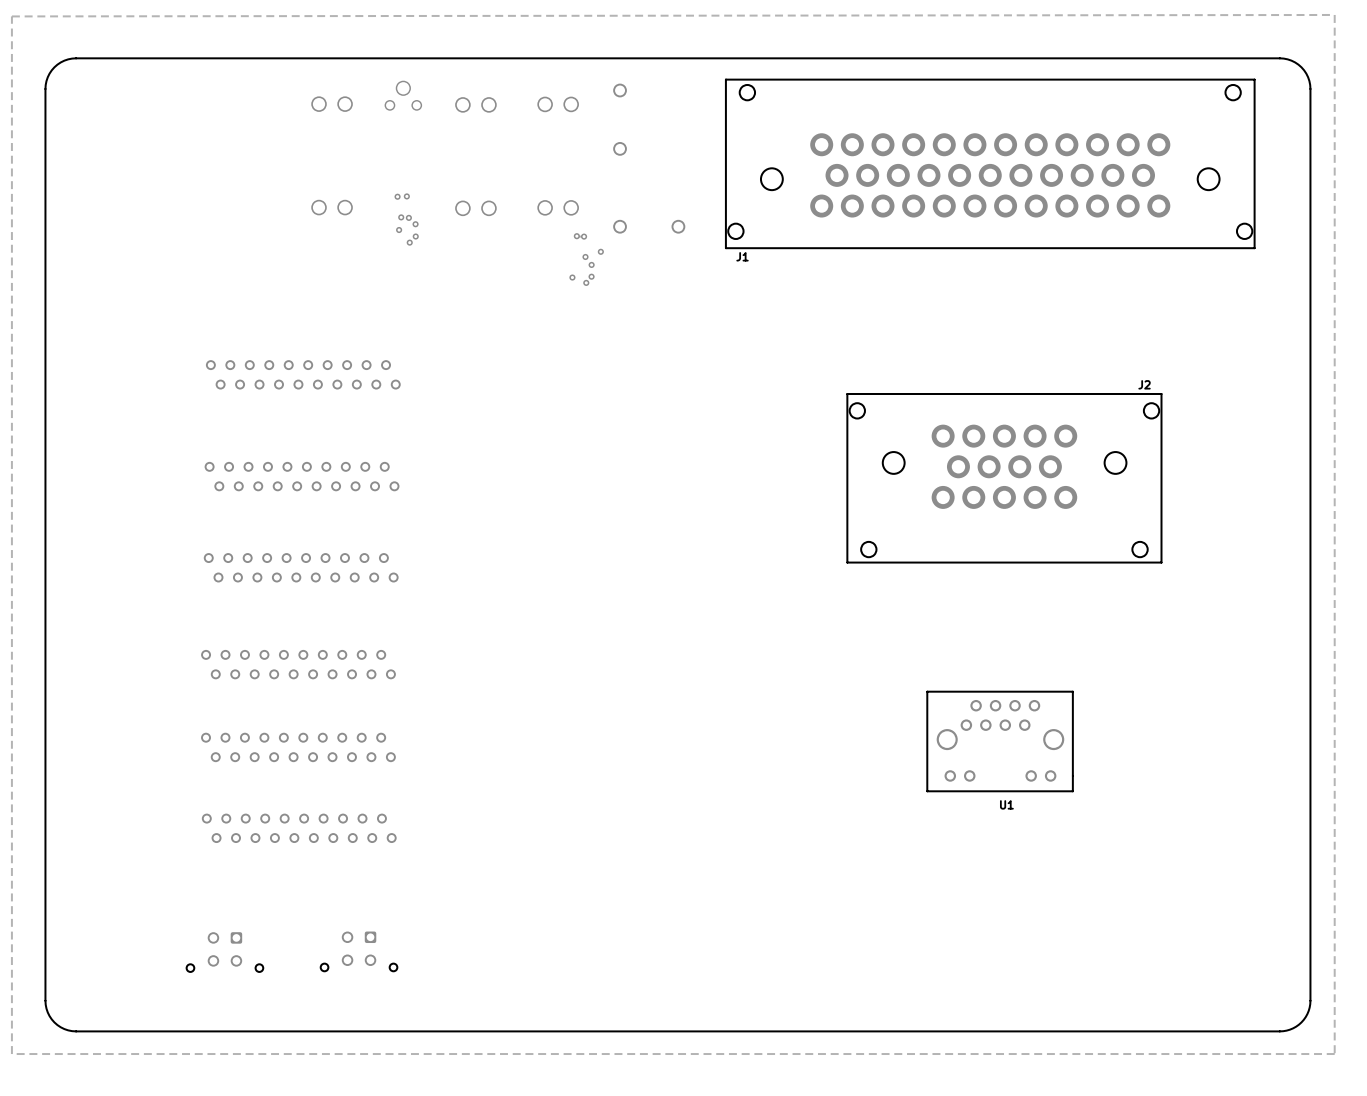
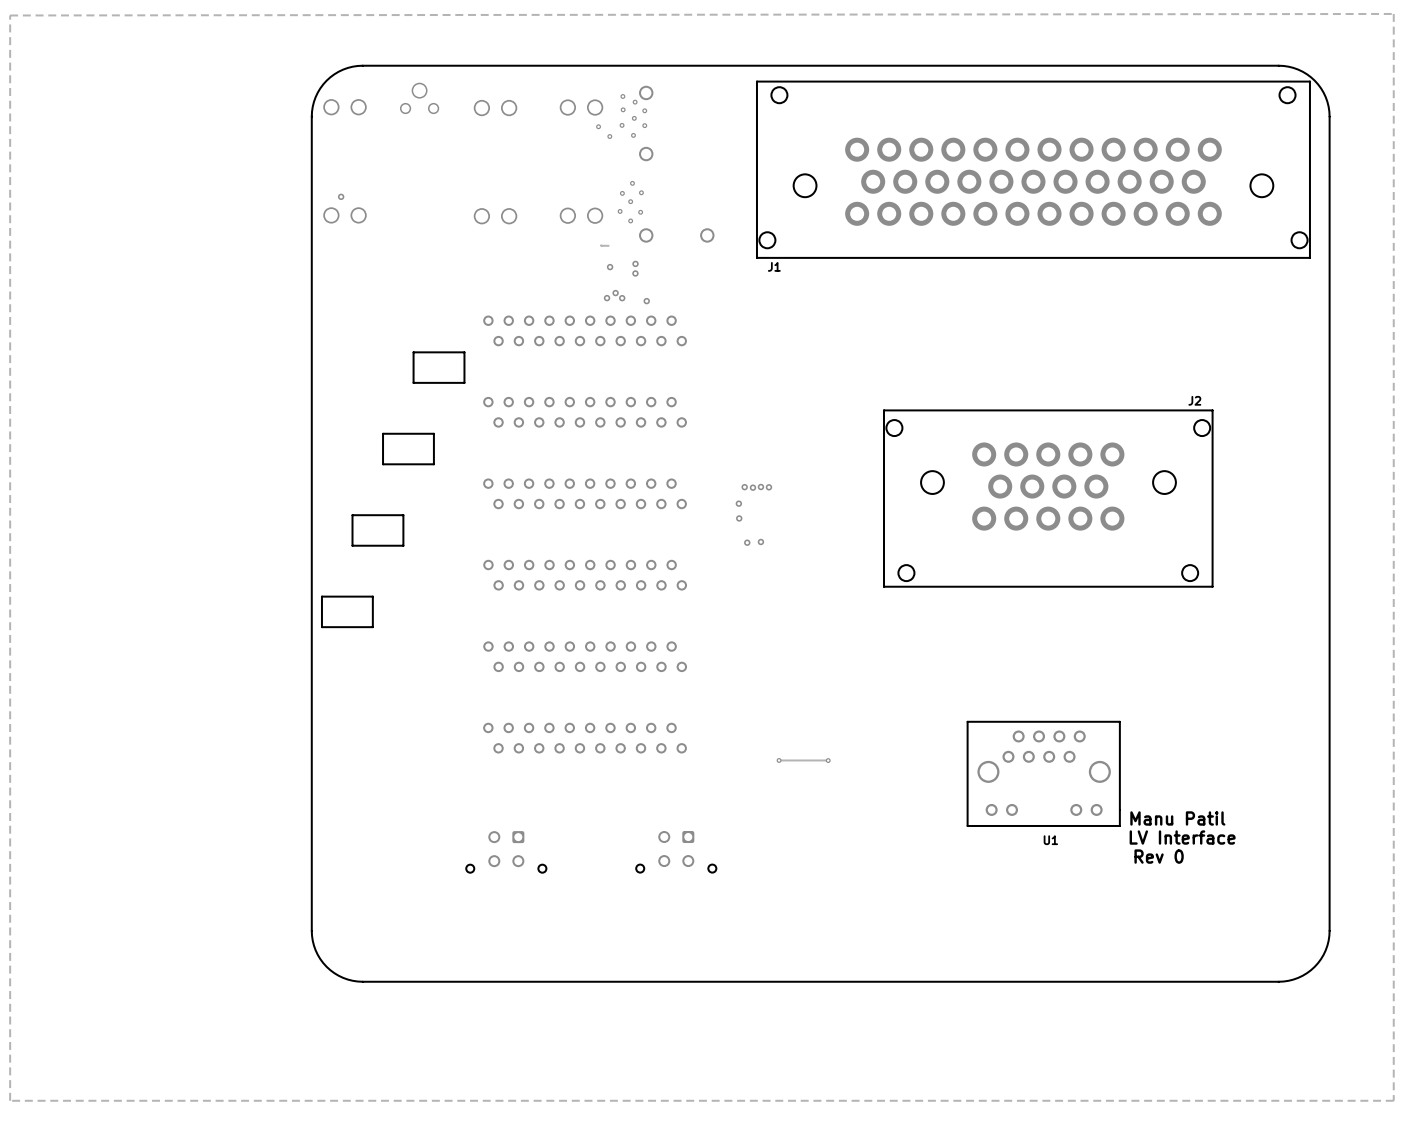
board edge: (1279, 58) (76, 58) (64, 60) (57, 64) (49, 73) (45, 88) (45, 1000) (47, 1012) (51, 1019) (60, 1027) (76, 1031) (1279, 1031) (1289, 1029) (1298, 1024) (1307, 1014) (1310, 1000) (1310, 88) (1308, 77) (1301, 67) (1291, 60) (1279, 58) -> (1278, 65) (1298, 69) (1314, 80) (1325, 97) (1329, 116) (1329, 930) (1325, 950) (1314, 966) (1298, 977) (1278, 981) (362, 981) (343, 977) (326, 966) (315, 950) (311, 930) (311, 116) (315, 97) (326, 80) (343, 69) (362, 65) (1278, 65)
via: none -> (622, 96)
via: none -> (635, 102)
via: none -> (623, 109)
via: none -> (644, 110)
via: none -> (634, 118)
via: none -> (622, 125)
via: none -> (644, 125)
via: none -> (598, 126)
via: none -> (633, 135)
via: none -> (609, 136)
via: none -> (632, 183)
via: none -> (641, 192)
via: none -> (622, 193)
via: none -> (341, 196)
via: none -> (630, 201)
via: (397, 196) -> none
via: (406, 196) -> none
via: none -> (620, 211)
via: none -> (640, 212)
via: none -> (630, 220)
via: (401, 217) -> none
via: (408, 217) -> none
via: (415, 224) -> none
via: (399, 230) -> none
via: (415, 236) -> none
via: (576, 236) -> none
via: (584, 236) -> none
via: (409, 242) -> none
via: (600, 251) -> none
via: none -> (635, 263)
via: none -> (635, 273)
via: (591, 264) -> none
via: (591, 276) -> none
via: (572, 277) -> none
via: none -> (615, 293)
via: (586, 282) -> none
via: none -> (607, 298)
via: none -> (622, 298)
via: none -> (646, 301)
part: none -> (585, 330)
board edge: none -> (464, 352) (413, 352) (413, 382) (464, 382) (464, 352)
part: (303, 374) -> none
part: none -> (585, 412)
board edge: none -> (433, 433) (433, 464) (383, 464) (383, 433) (433, 433)
via: none -> (744, 487)
via: none -> (752, 487)
via: none -> (760, 487)
via: none -> (768, 487)
part: none -> (585, 493)
part: (302, 476) -> none
via: none -> (738, 503)
board edge: none -> (403, 515) (403, 545) (352, 545) (352, 515) (403, 515)
via: none -> (739, 518)
via: none -> (760, 541)
via: none -> (747, 542)
part: none -> (585, 575)
part: (301, 567) -> none
board edge: none -> (372, 596) (372, 627) (321, 627) (321, 596) (372, 596)
part: none -> (585, 656)
part: (298, 664) -> none
part: none -> (585, 738)
via: none -> (779, 760)
track: none -> (828, 760) (779, 760)
via: none -> (828, 760)
part: (298, 747) -> none
text: none -> Manu Patil (1177, 818)
text: none -> LV Interface (1182, 837)
part: none -> (676, 851)
part: none -> (506, 851)
text: none -> Rev 0 (1159, 856)
part: (299, 828) -> none
part: (359, 951) -> none
part: (224, 952) -> none

